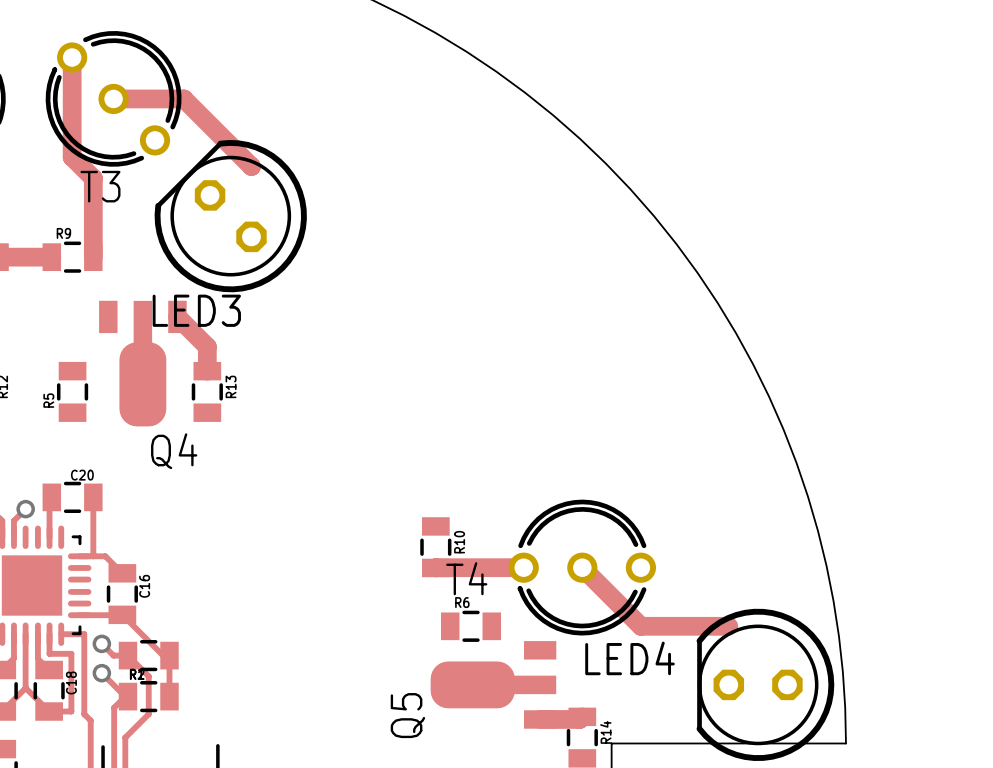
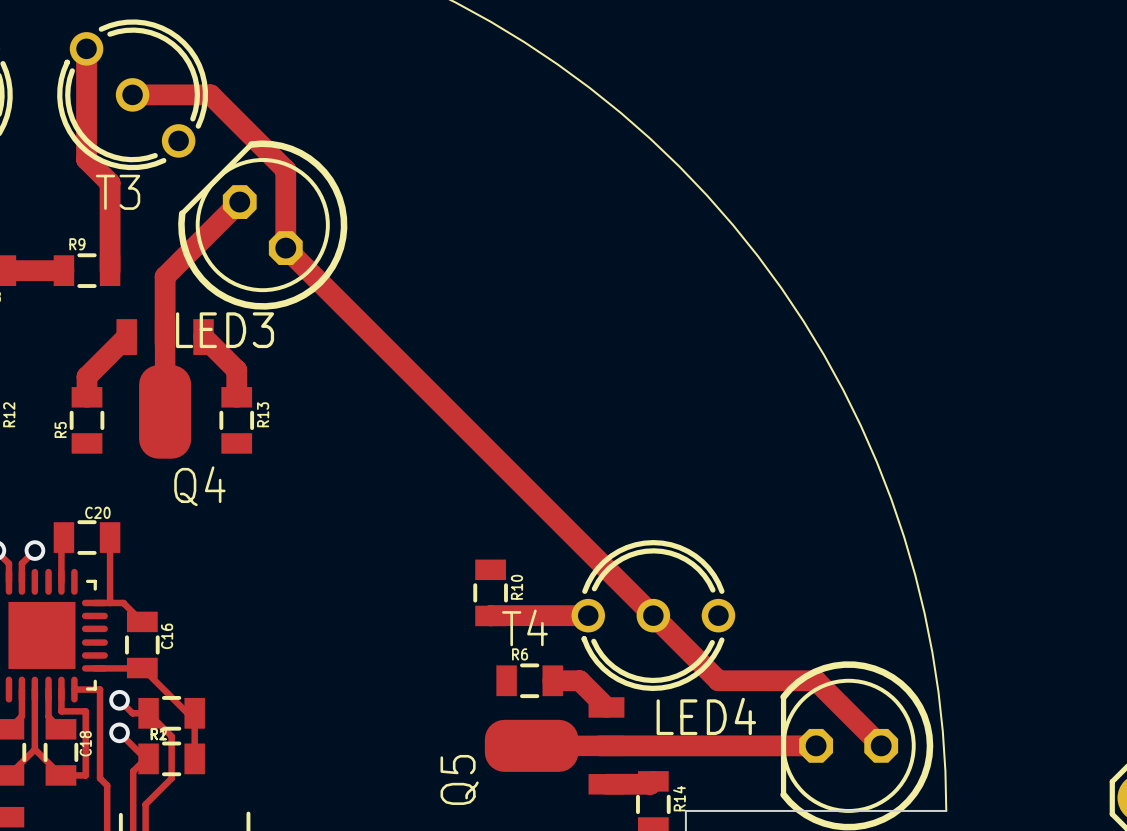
track: none -> (285, 169) (285, 248) (653, 615)
track: none -> (239, 202) (165, 276) (165, 343)
track: none -> (126, 337) (87, 376) (87, 397)
track: none -> (552, 680) (579, 680) (606, 707)
track: none -> (816, 680) (881, 745)
track: none -> (599, 745) (816, 745)

